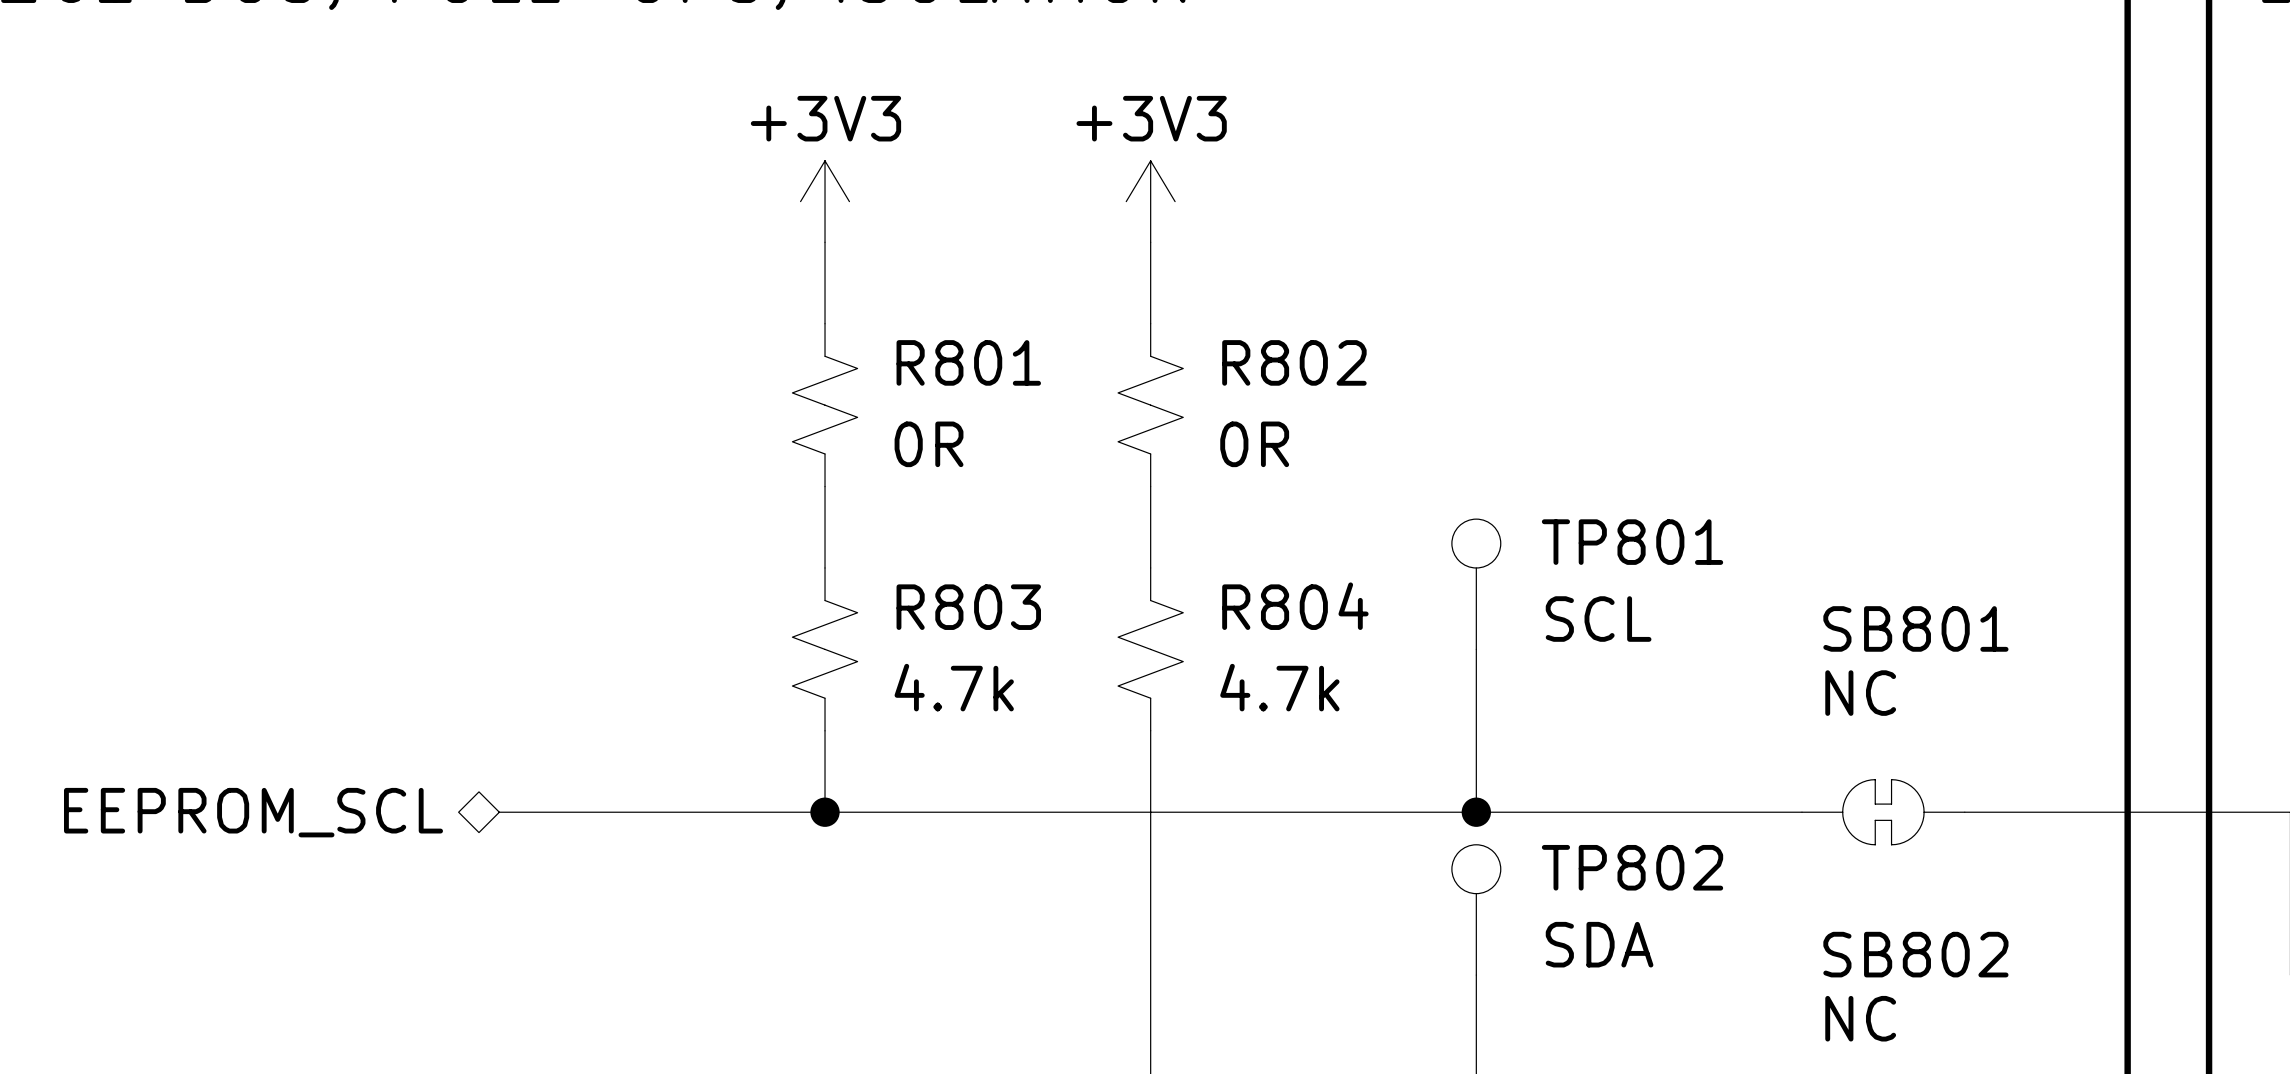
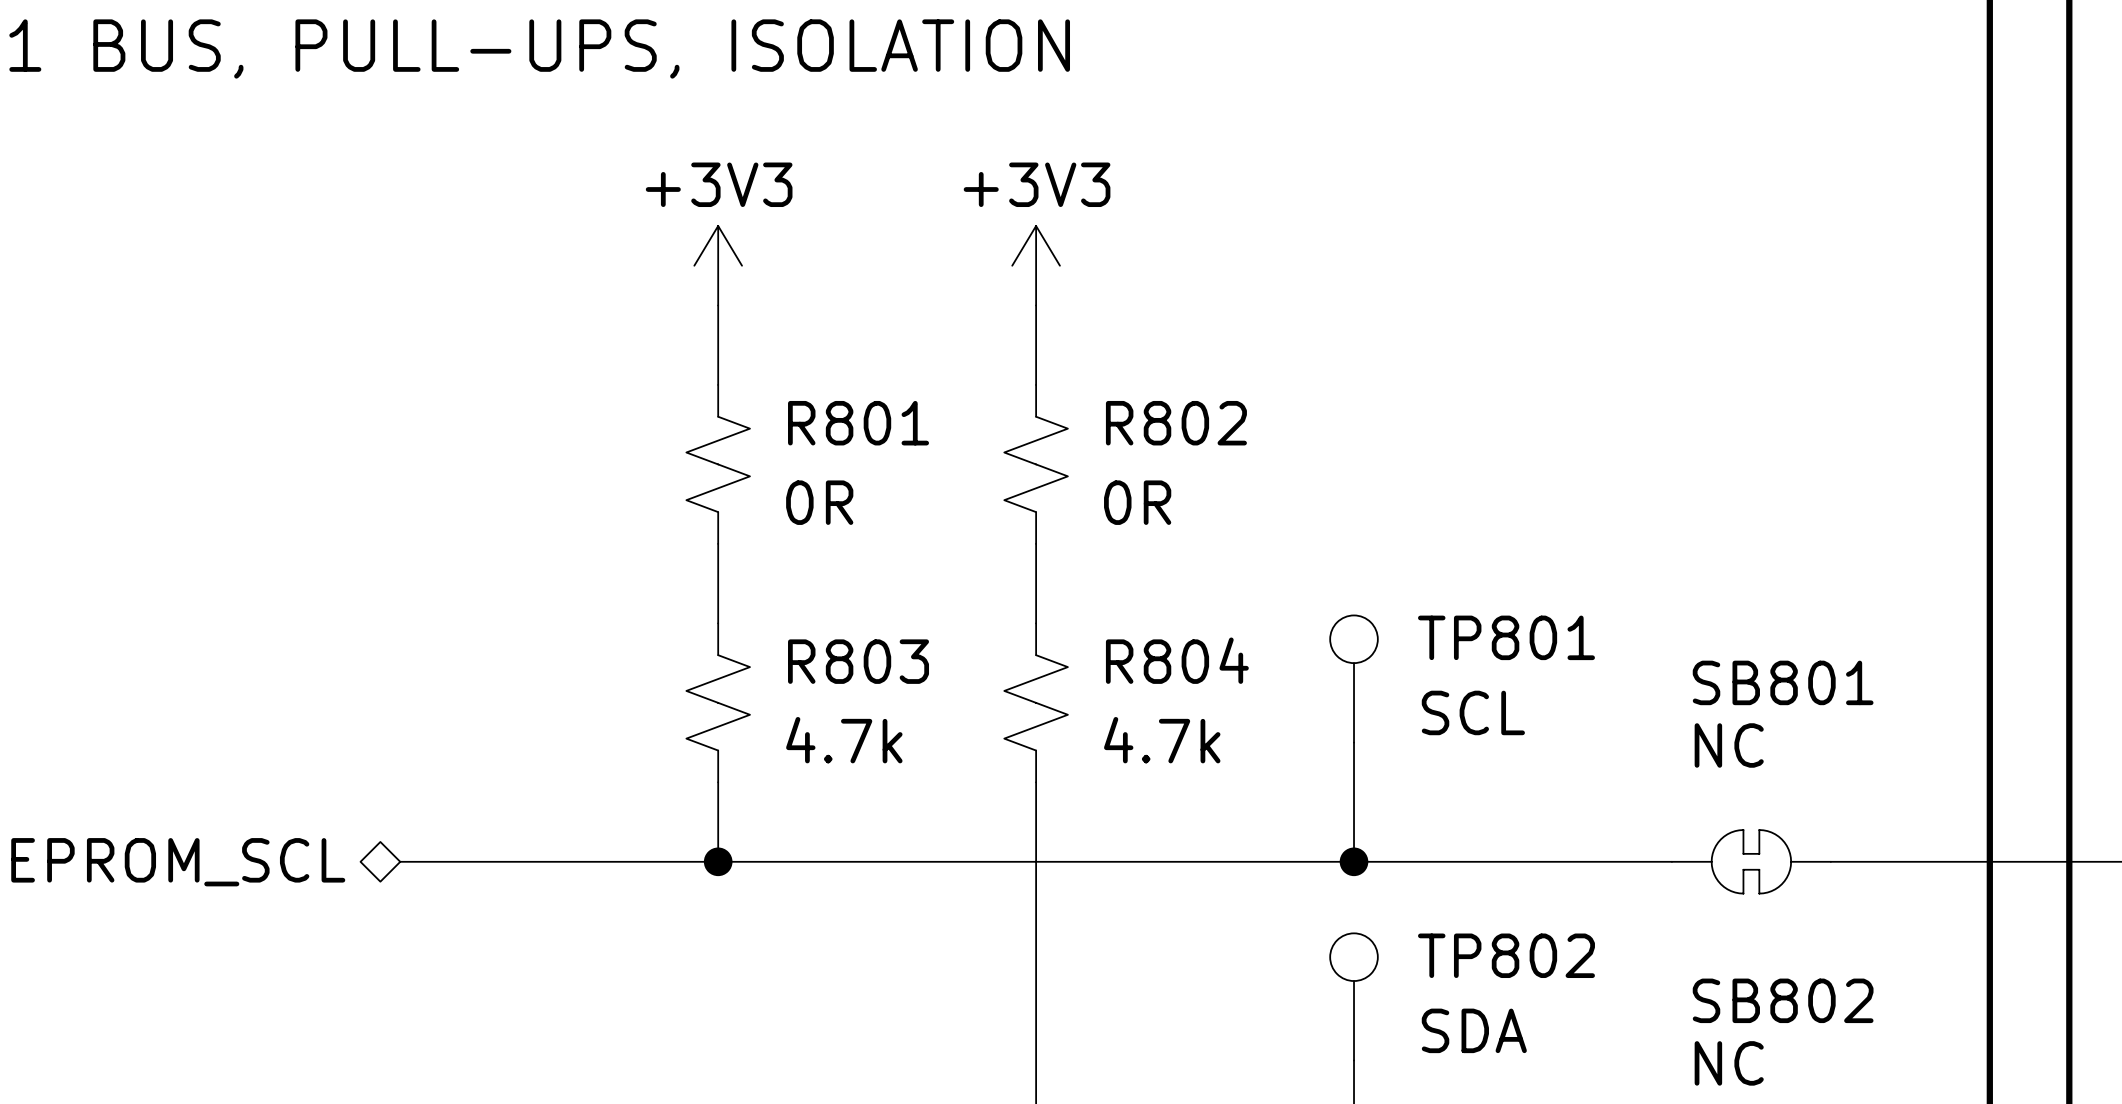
TP801 position: (1476, 584) -> (1354, 679)
TP802 position: (1476, 909) -> (1354, 996)

